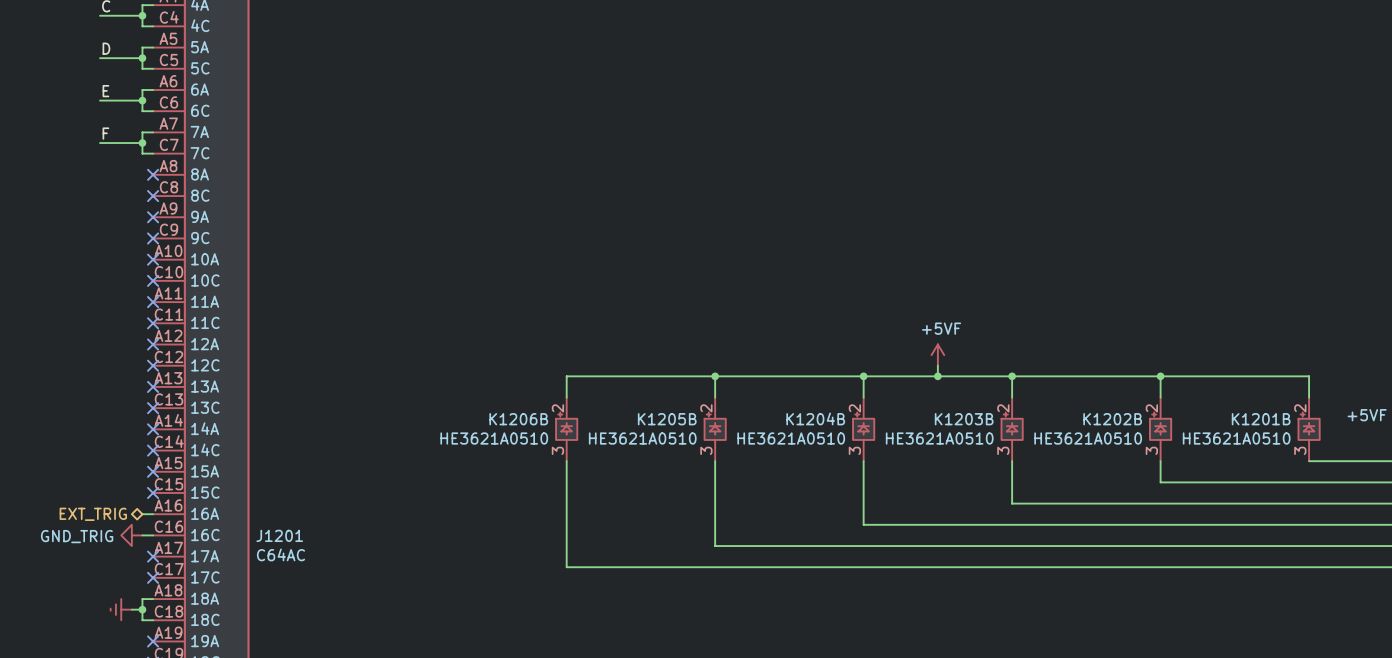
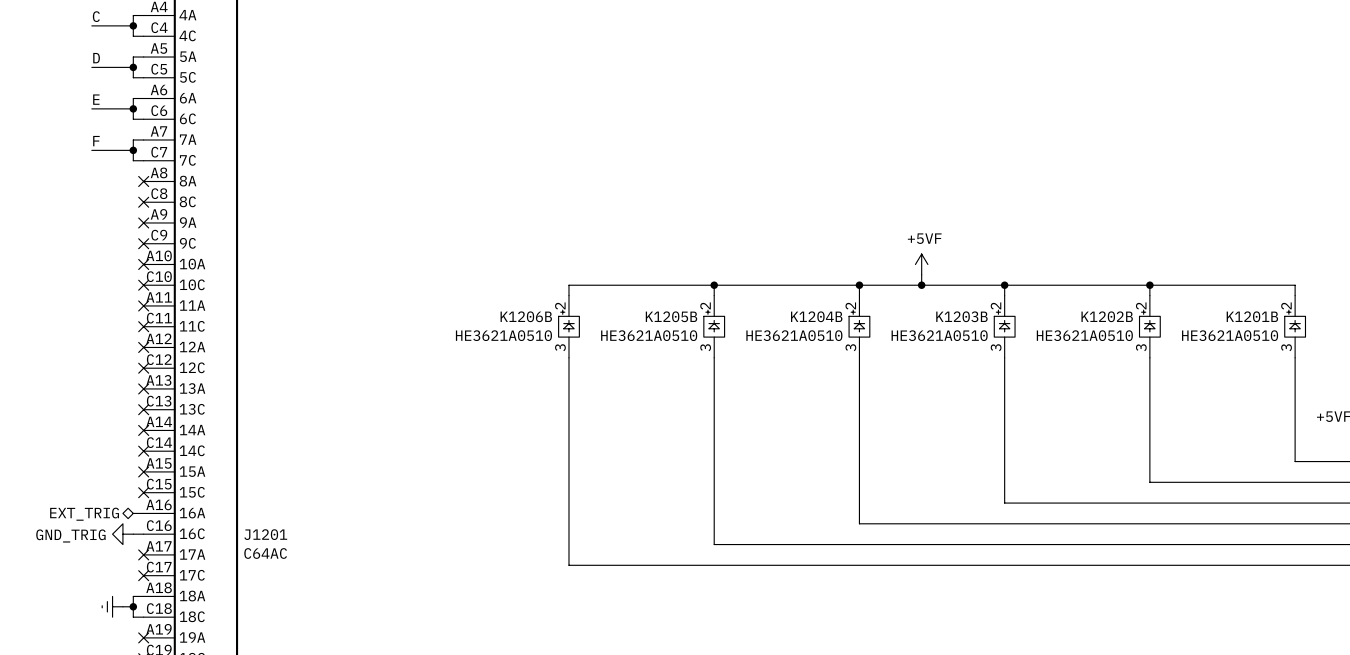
wire: none -> (714, 285) (714, 295)
junction: none -> (714, 285)
wire: none -> (859, 285) (859, 295)
junction: none -> (859, 285)
junction: none -> (921, 285)
wire: none -> (1004, 285) (1004, 295)
junction: none -> (1004, 285)
wire: none -> (1149, 285) (1149, 295)
junction: none -> (1149, 285)
wire: none -> (568, 295) (568, 285) (1295, 285) (1295, 295)
power symbol position: +5VF (937, 355) -> +5VF (921, 264)
wire: (937, 365) (937, 376) -> (921, 274) (921, 285)
wire: (715, 376) (715, 397) -> none
junction: (715, 376) -> none
wire: (863, 376) (863, 397) -> none
junction: (863, 376) -> none
junction: (937, 376) -> none
wire: (1012, 376) (1012, 397) -> none
junction: (1012, 376) -> none
wire: (1160, 376) (1160, 397) -> none
junction: (1160, 376) -> none
wire: (566, 397) (566, 376) (1309, 376) (1309, 397) -> none
K1206B position: (566, 429) -> (568, 326)
K1205B position: (715, 429) -> (714, 326)
K1204B position: (863, 429) -> (859, 326)
K1203B position: (1012, 429) -> (1004, 326)
K1202B position: (1160, 429) -> (1149, 326)
K1201B position: (1309, 429) -> (1295, 326)
wire: (566, 461) (566, 567) (587, 567) -> (568, 357) (568, 565)
wire: (715, 461) (715, 546) (736, 546) -> (714, 357) (714, 544)
wire: (863, 461) (863, 524) (884, 524) -> (859, 357) (859, 523)
wire: (1012, 461) (1012, 503) (1033, 503) -> (1004, 357) (1004, 503)
wire: (1160, 461) (1160, 482) (1181, 482) -> (1149, 357) (1149, 482)
wire: (1309, 461) (1330, 461) -> (1295, 357) (1295, 461)

